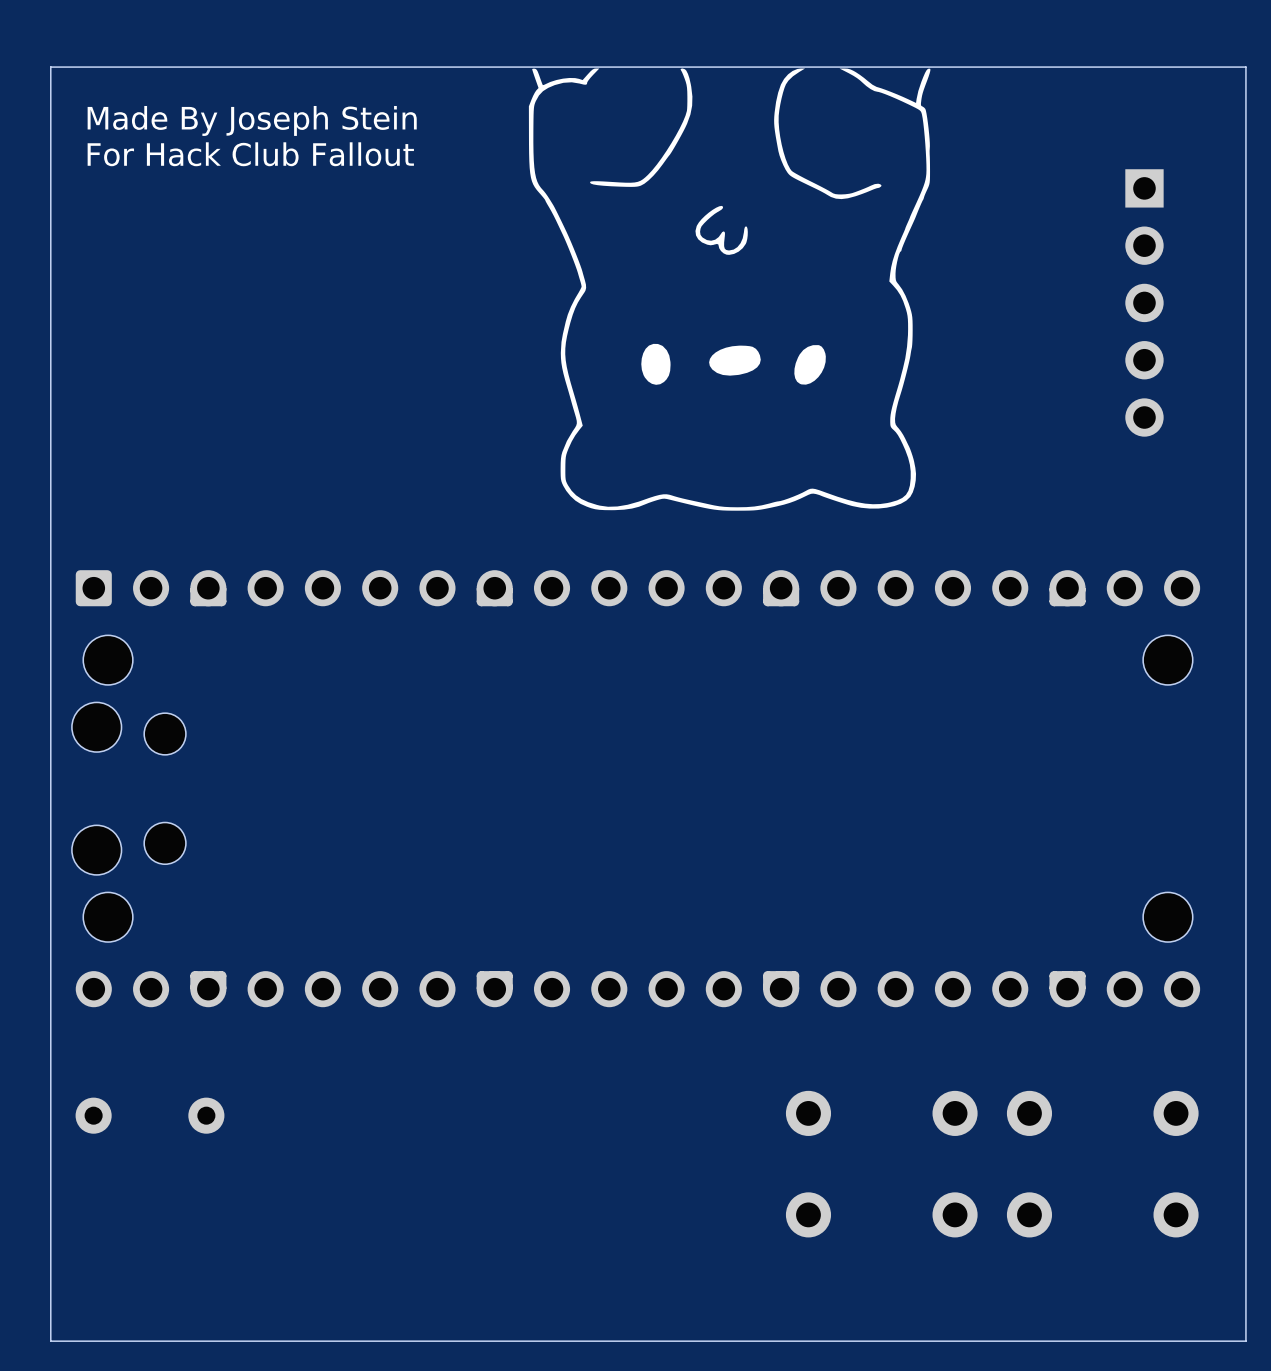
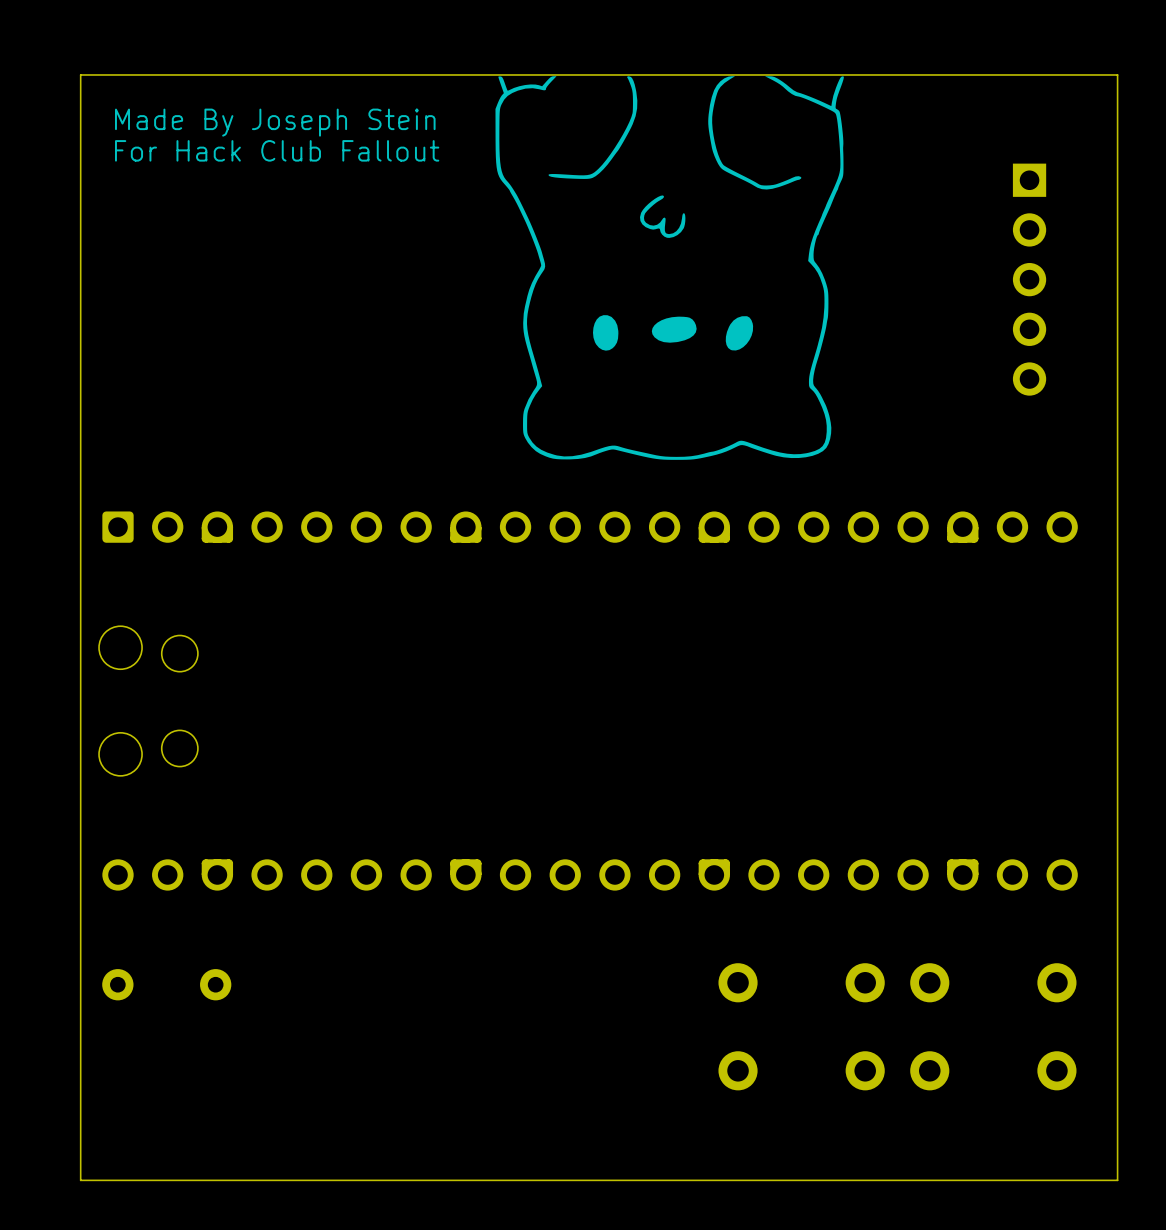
part: (108, 660) -> none
part: (1167, 660) -> none
part: (108, 917) -> none
part: (1167, 917) -> none

